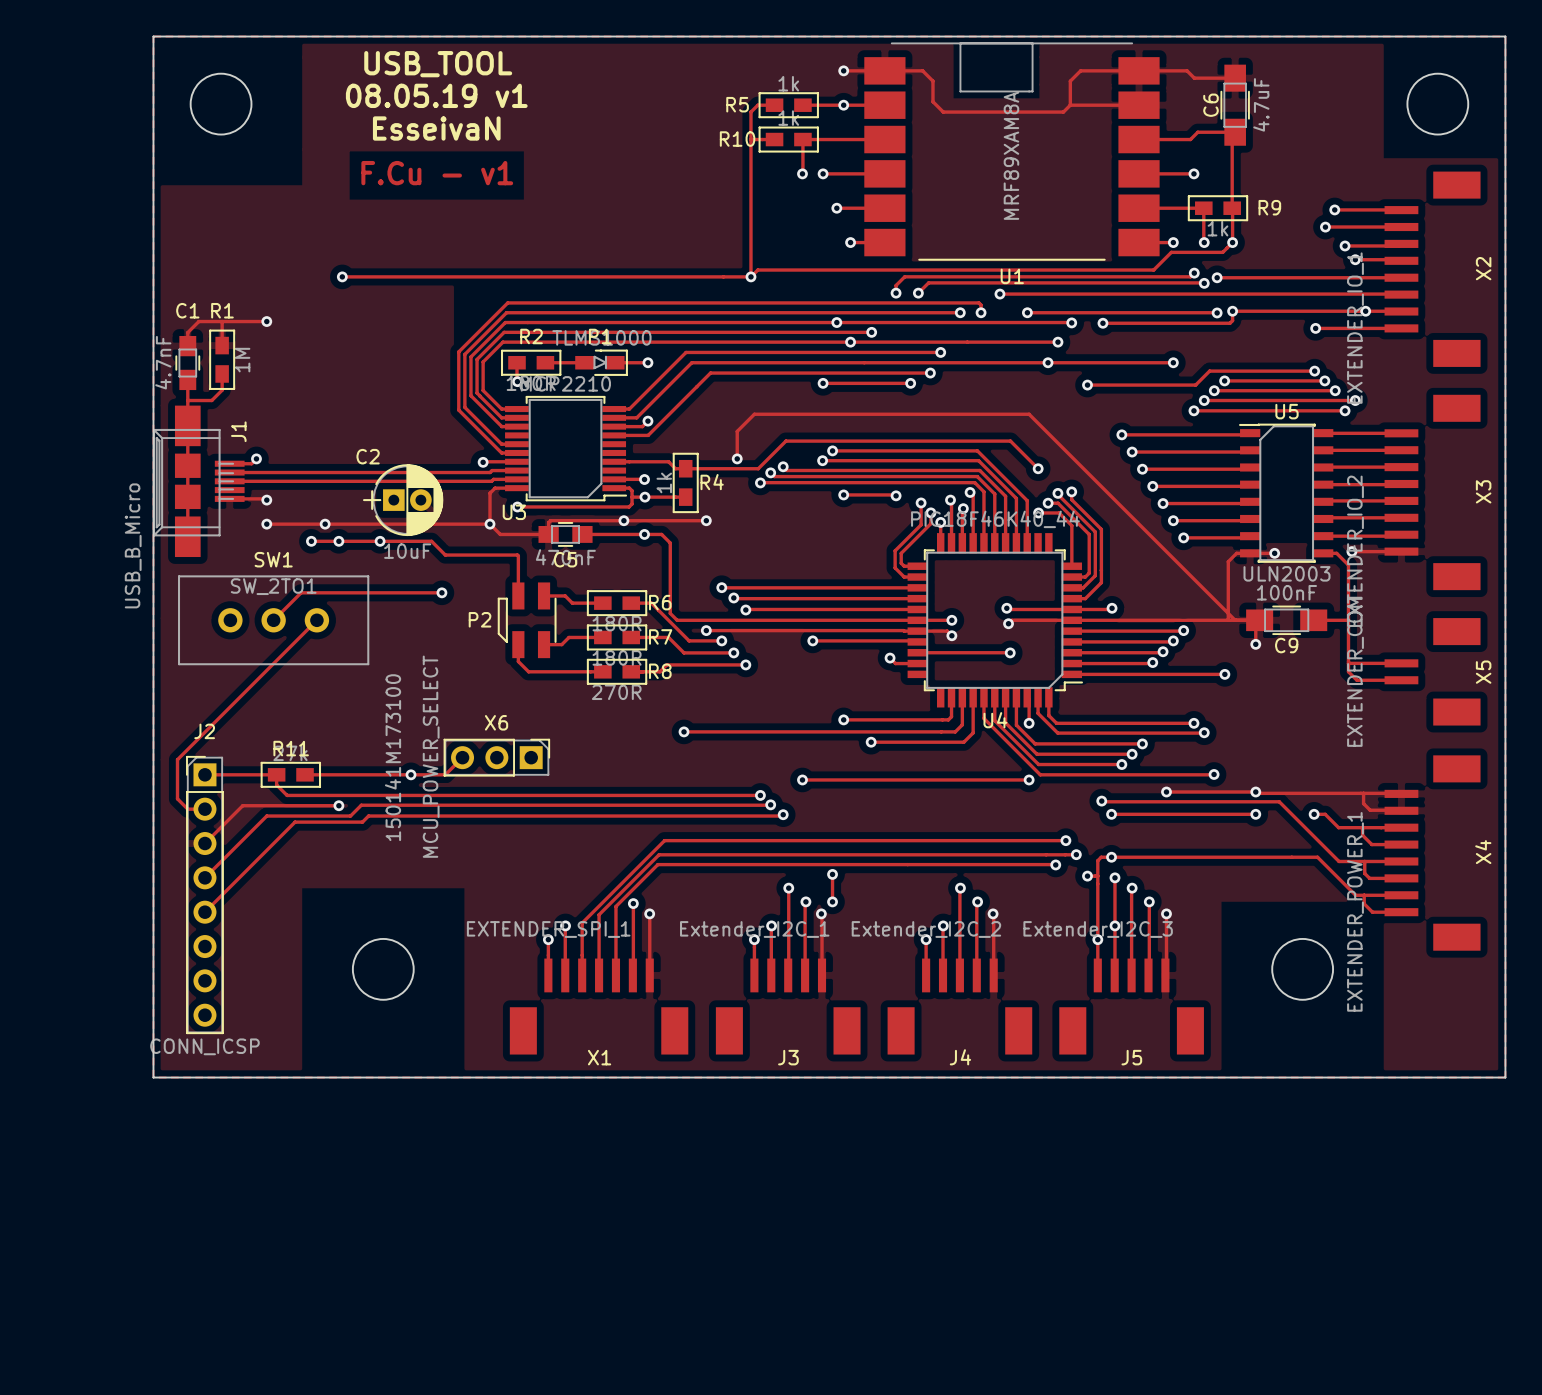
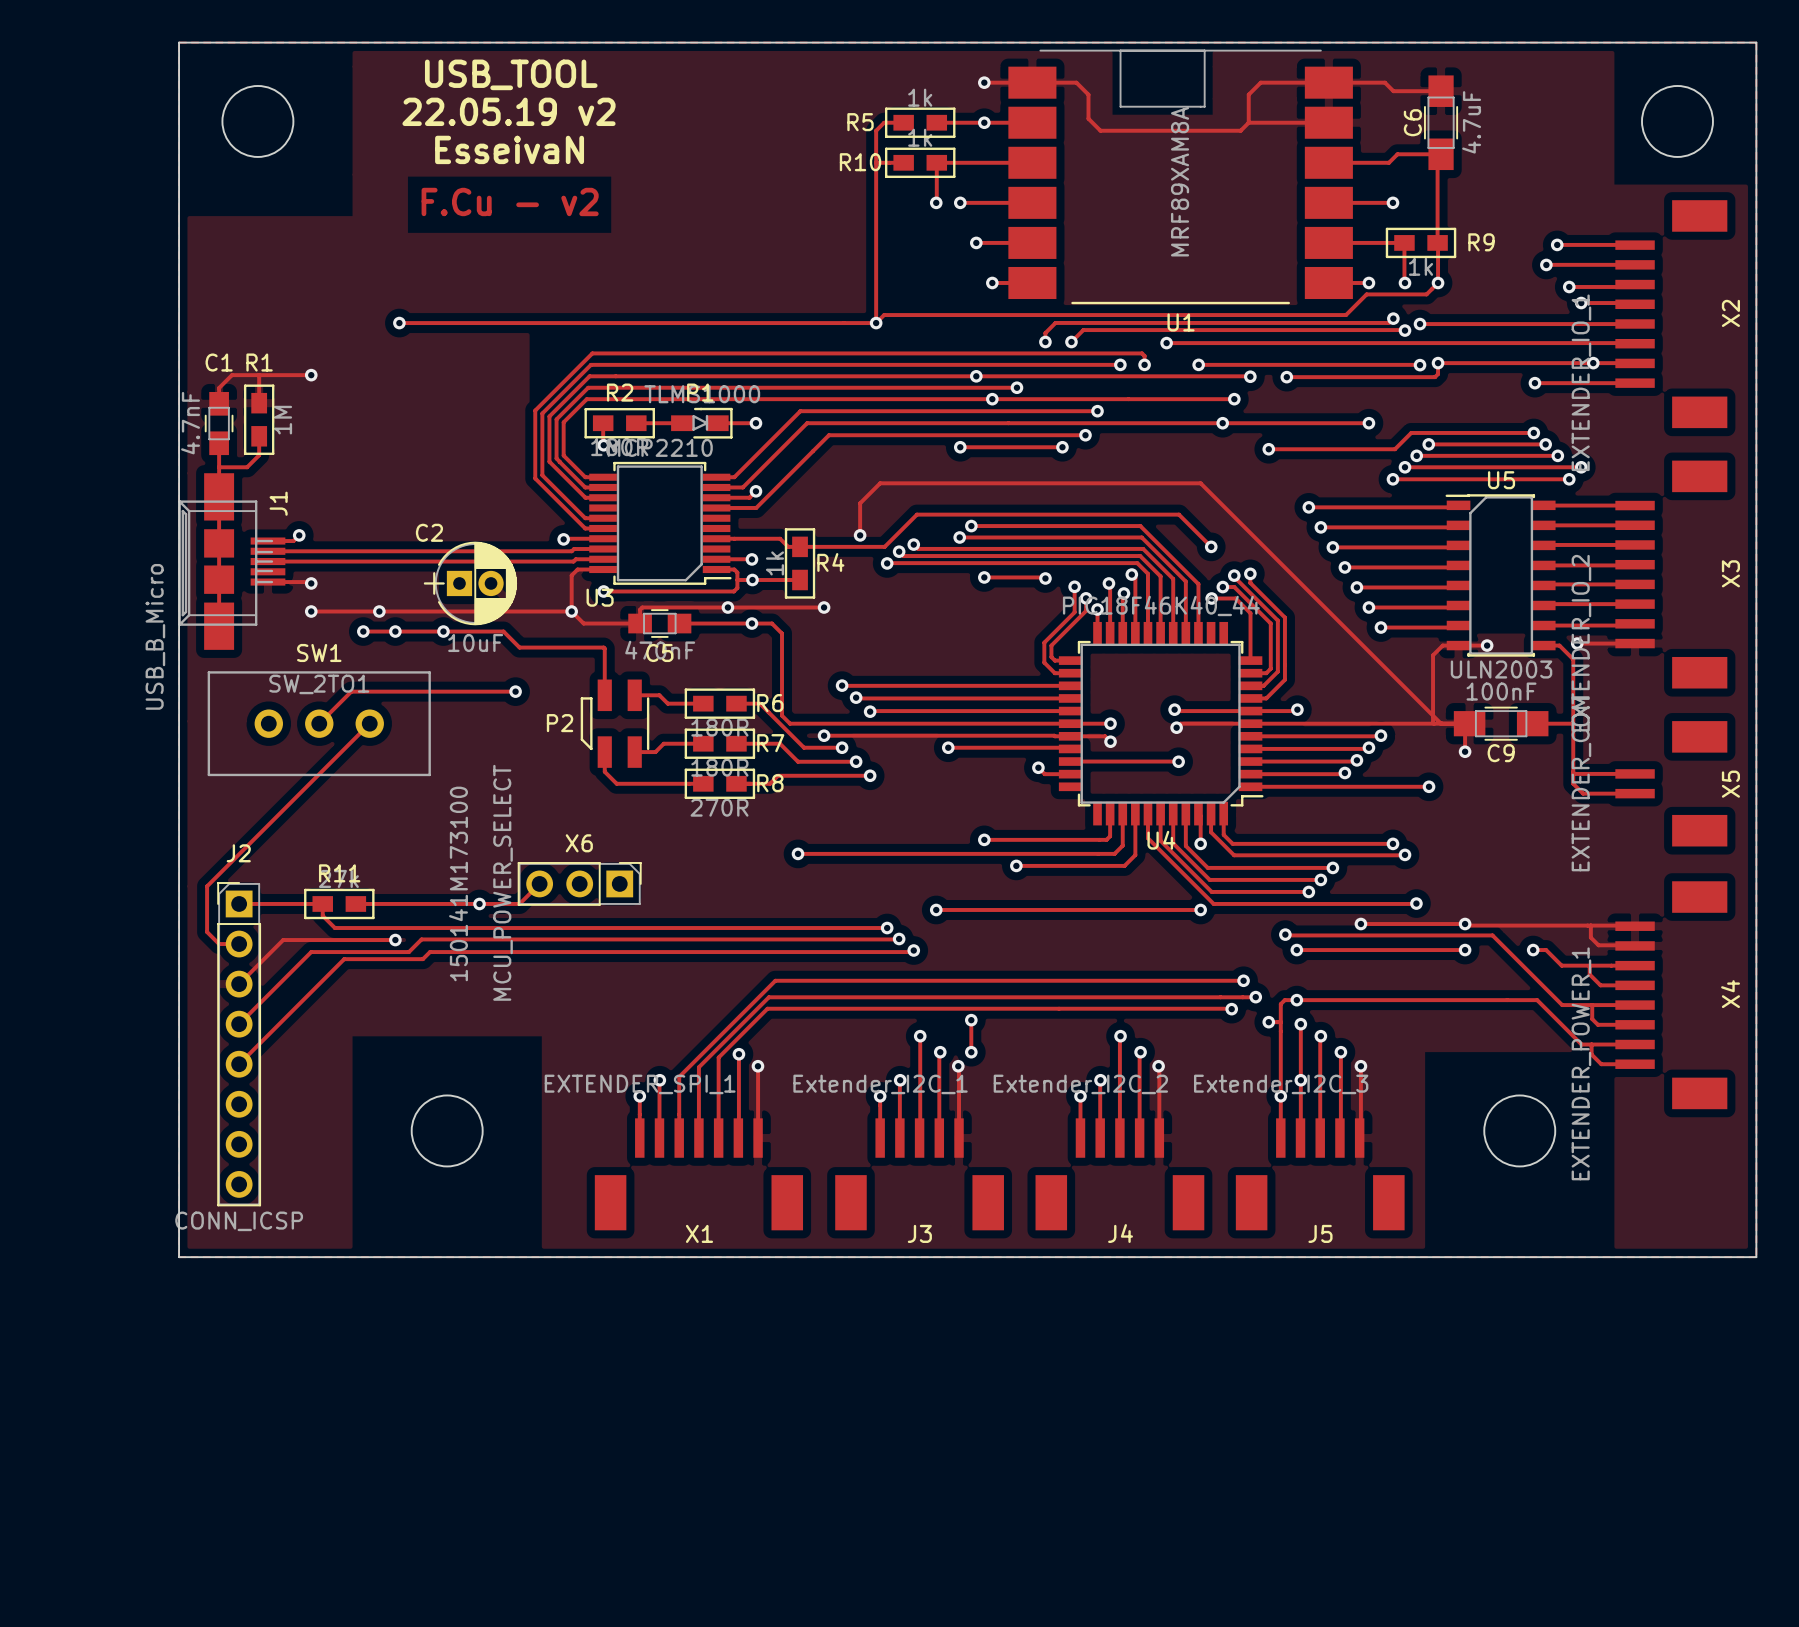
text: 08.05.19 v1 (436, 95) -> 22.05.19 v2 (509, 111)
text: F.Cu - v1 (437, 173) -> F.Cu - v2 (510, 201)

